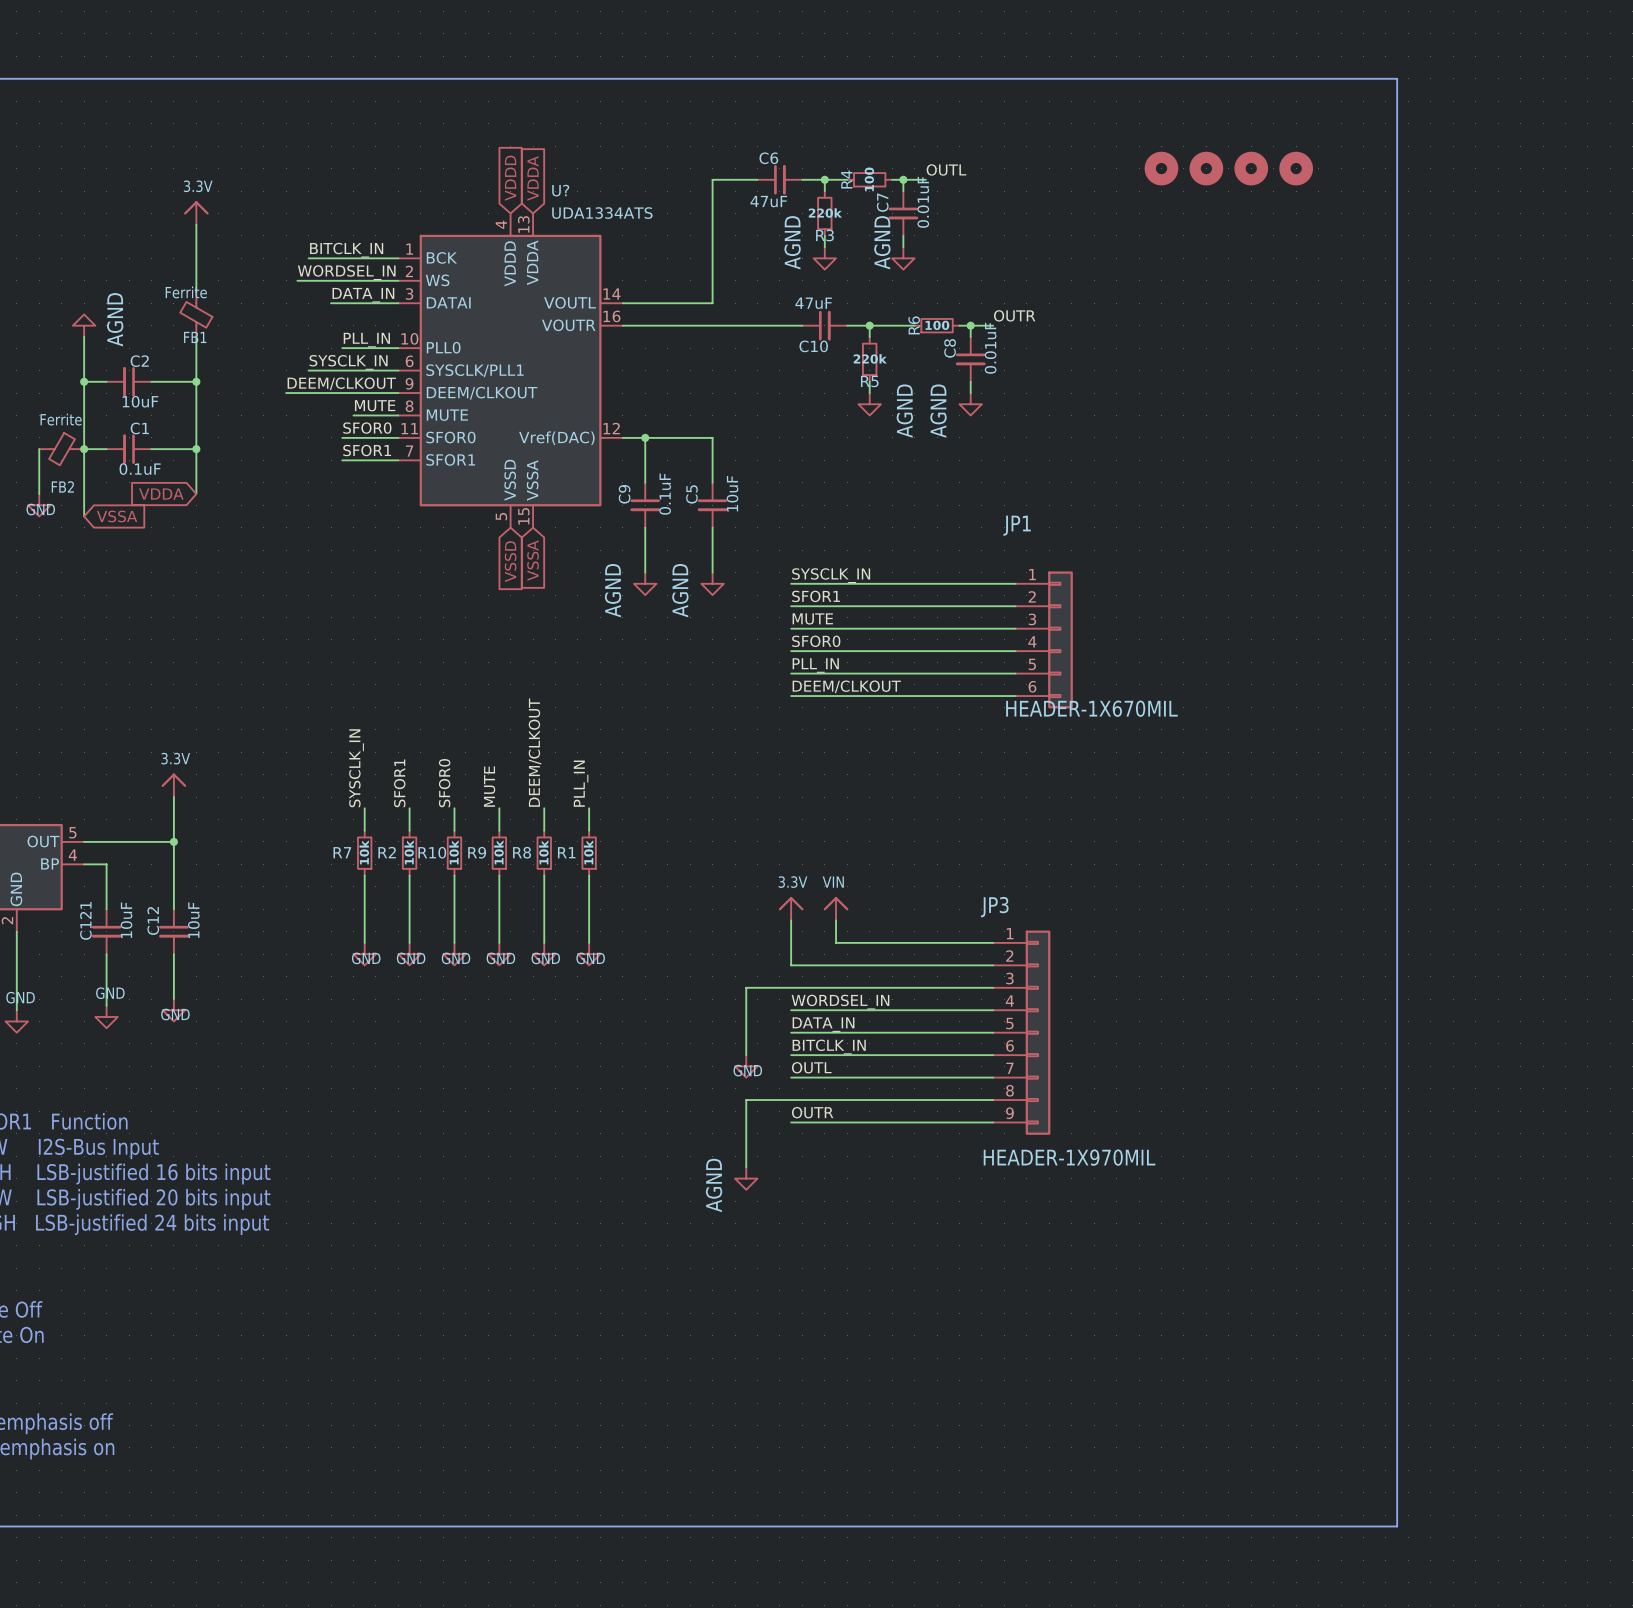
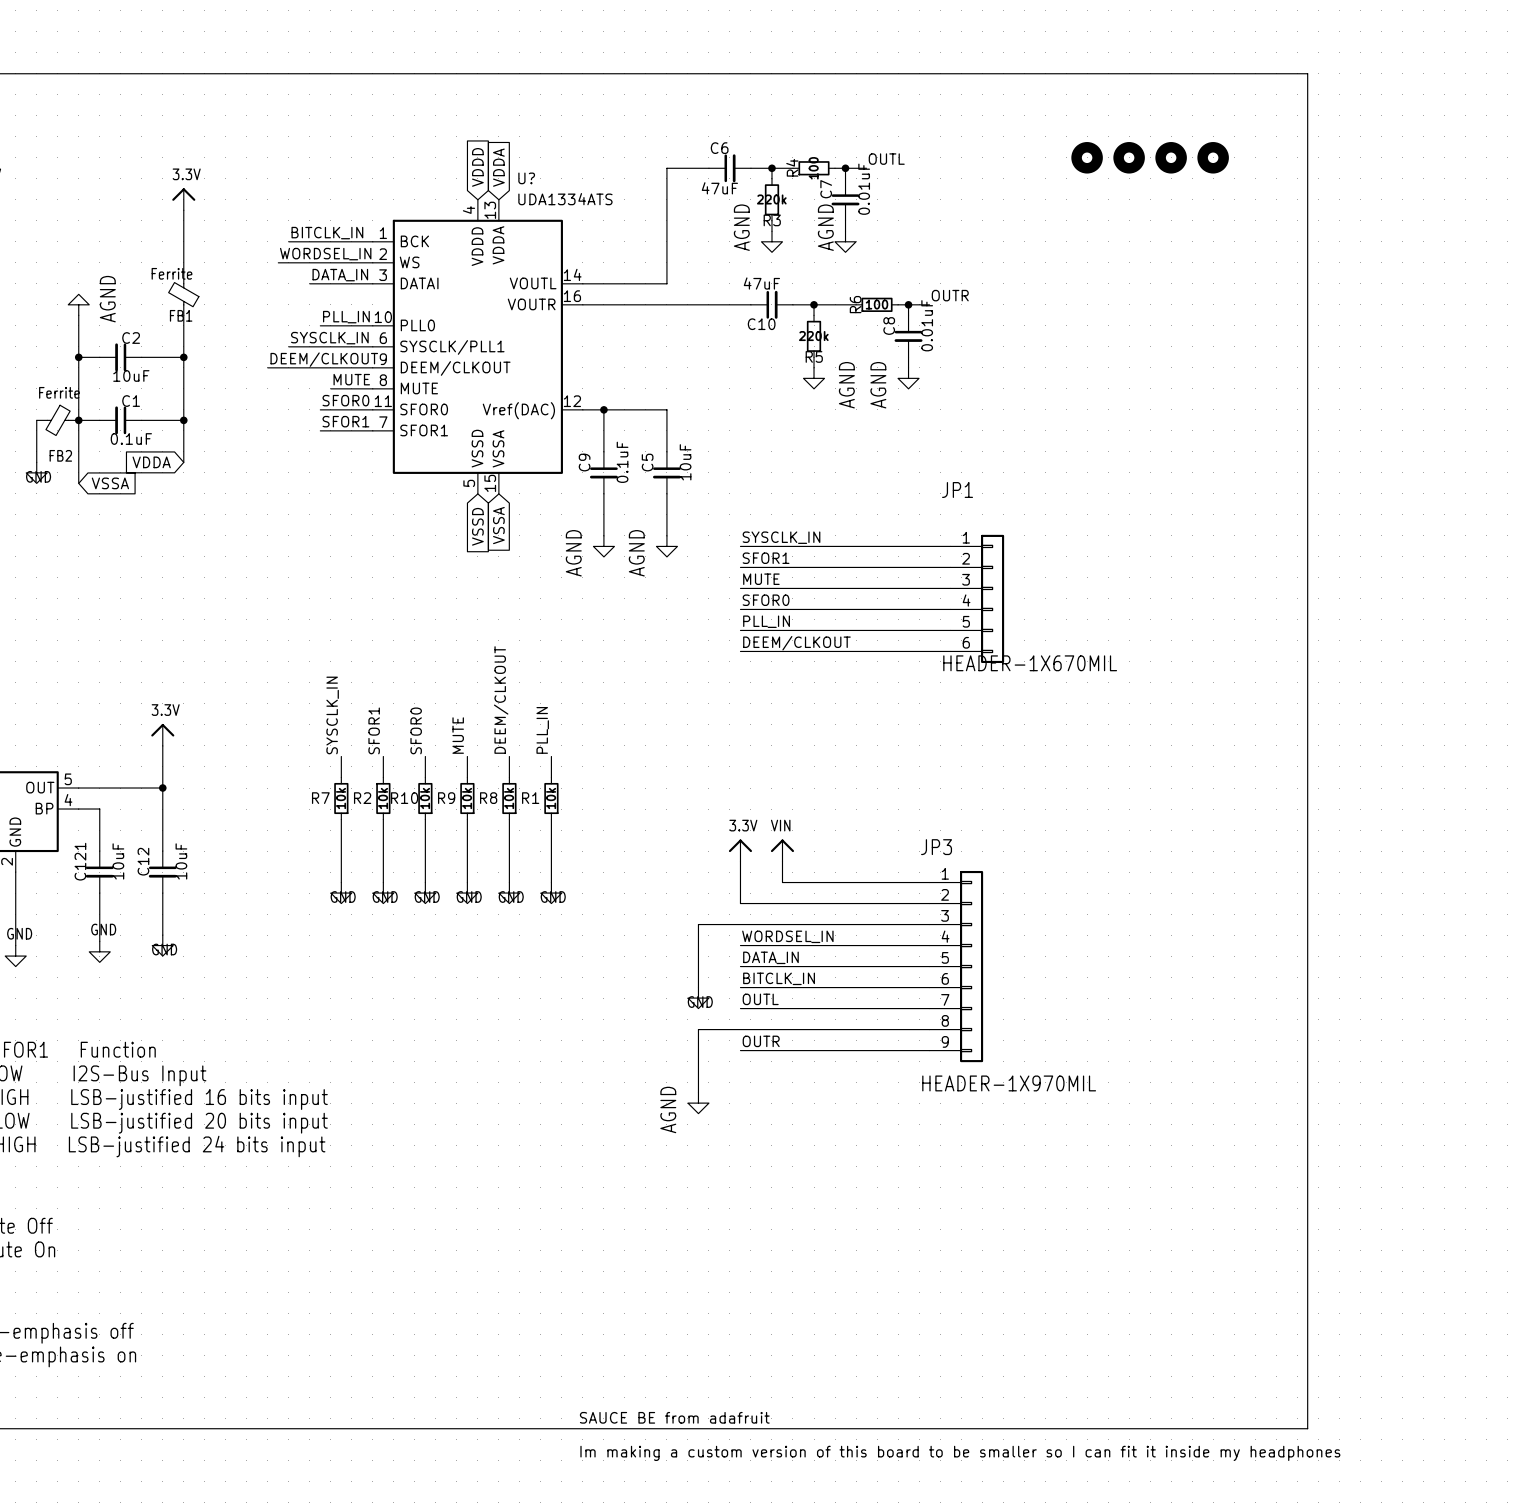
text: none -> SAUCE BE from adafruit (674, 1417)
text: none -> Im making a custom version of this board to be smaller so I can fit it inside my headphones (960, 1453)

